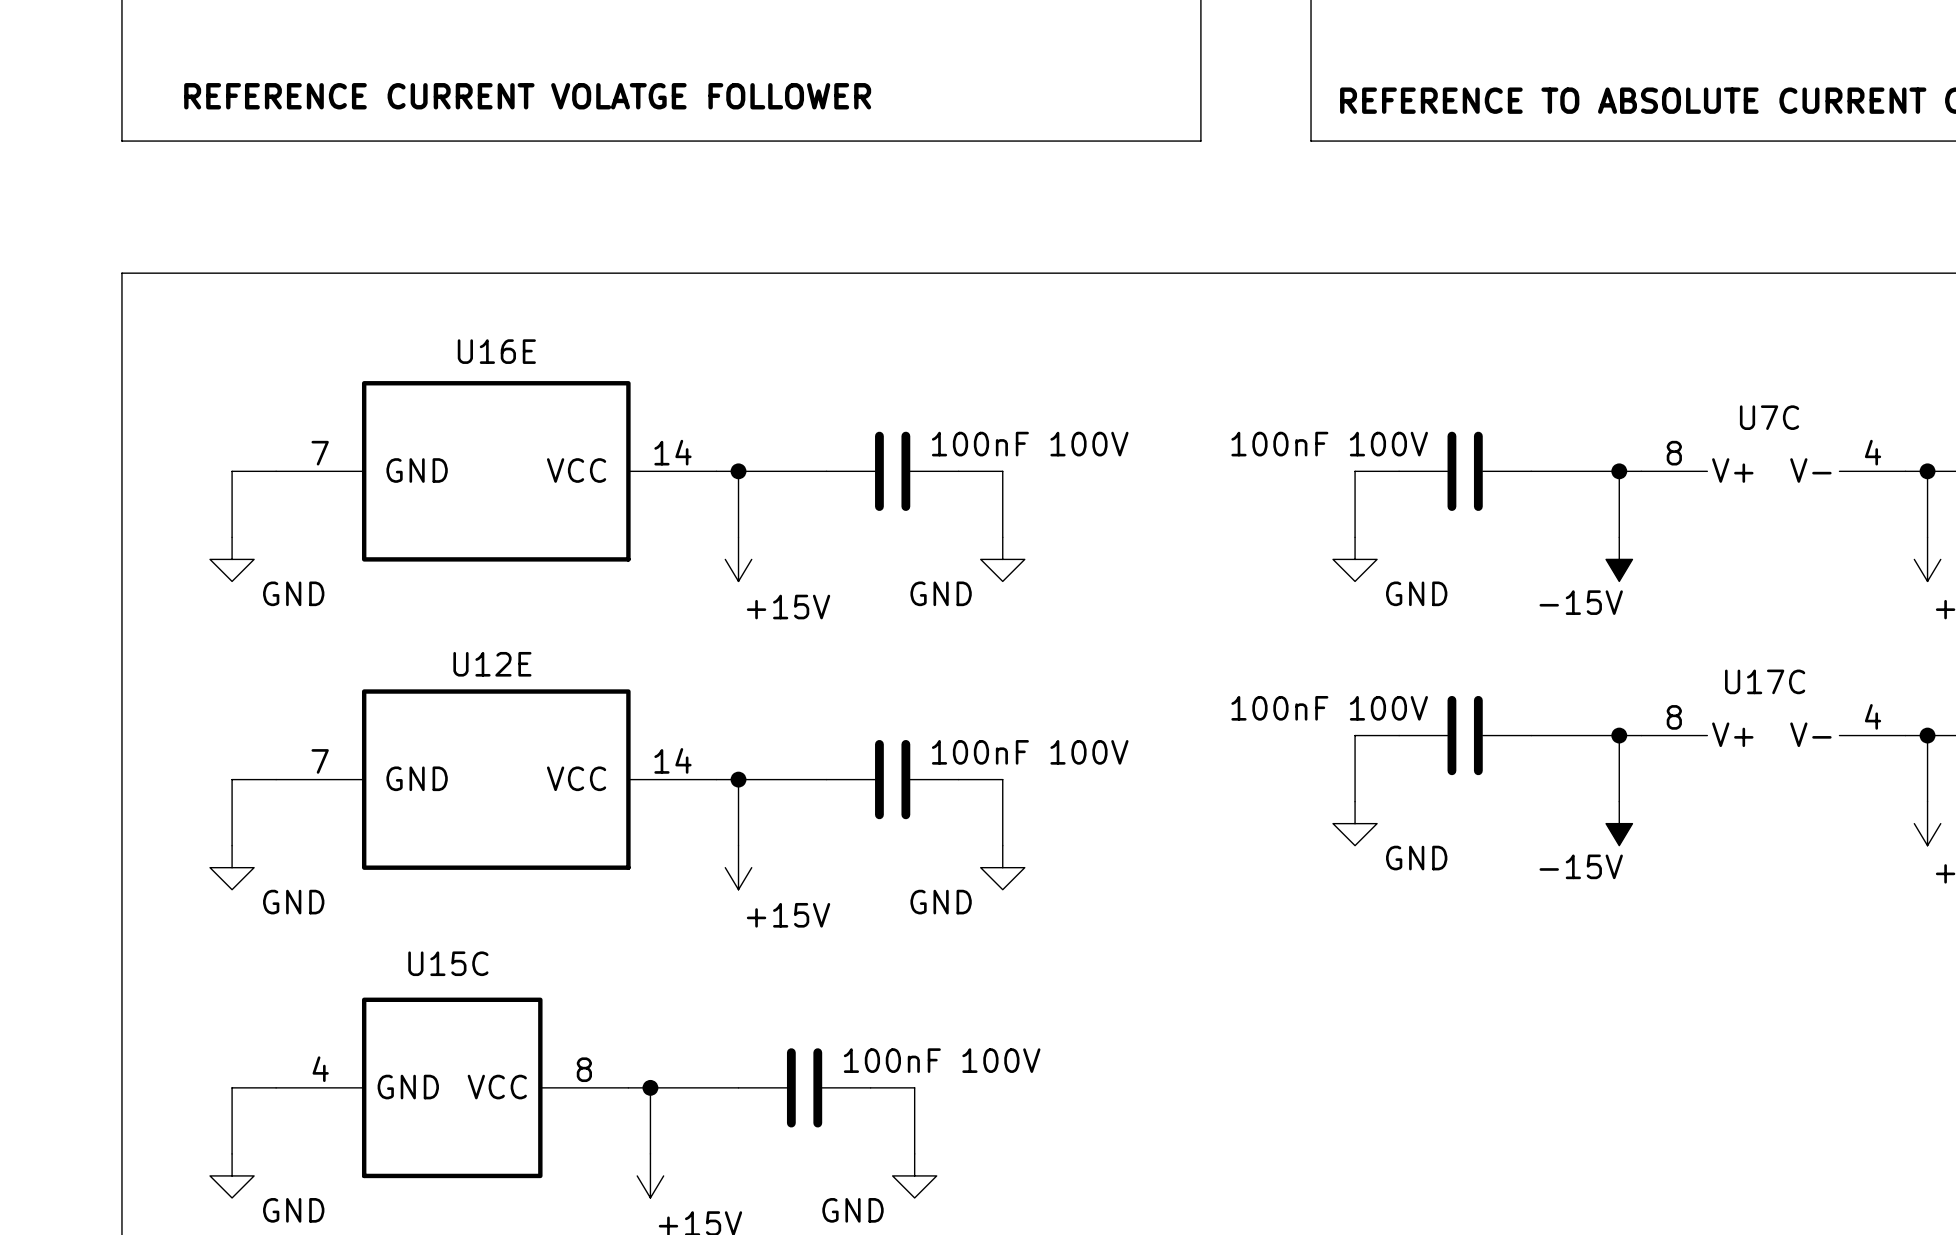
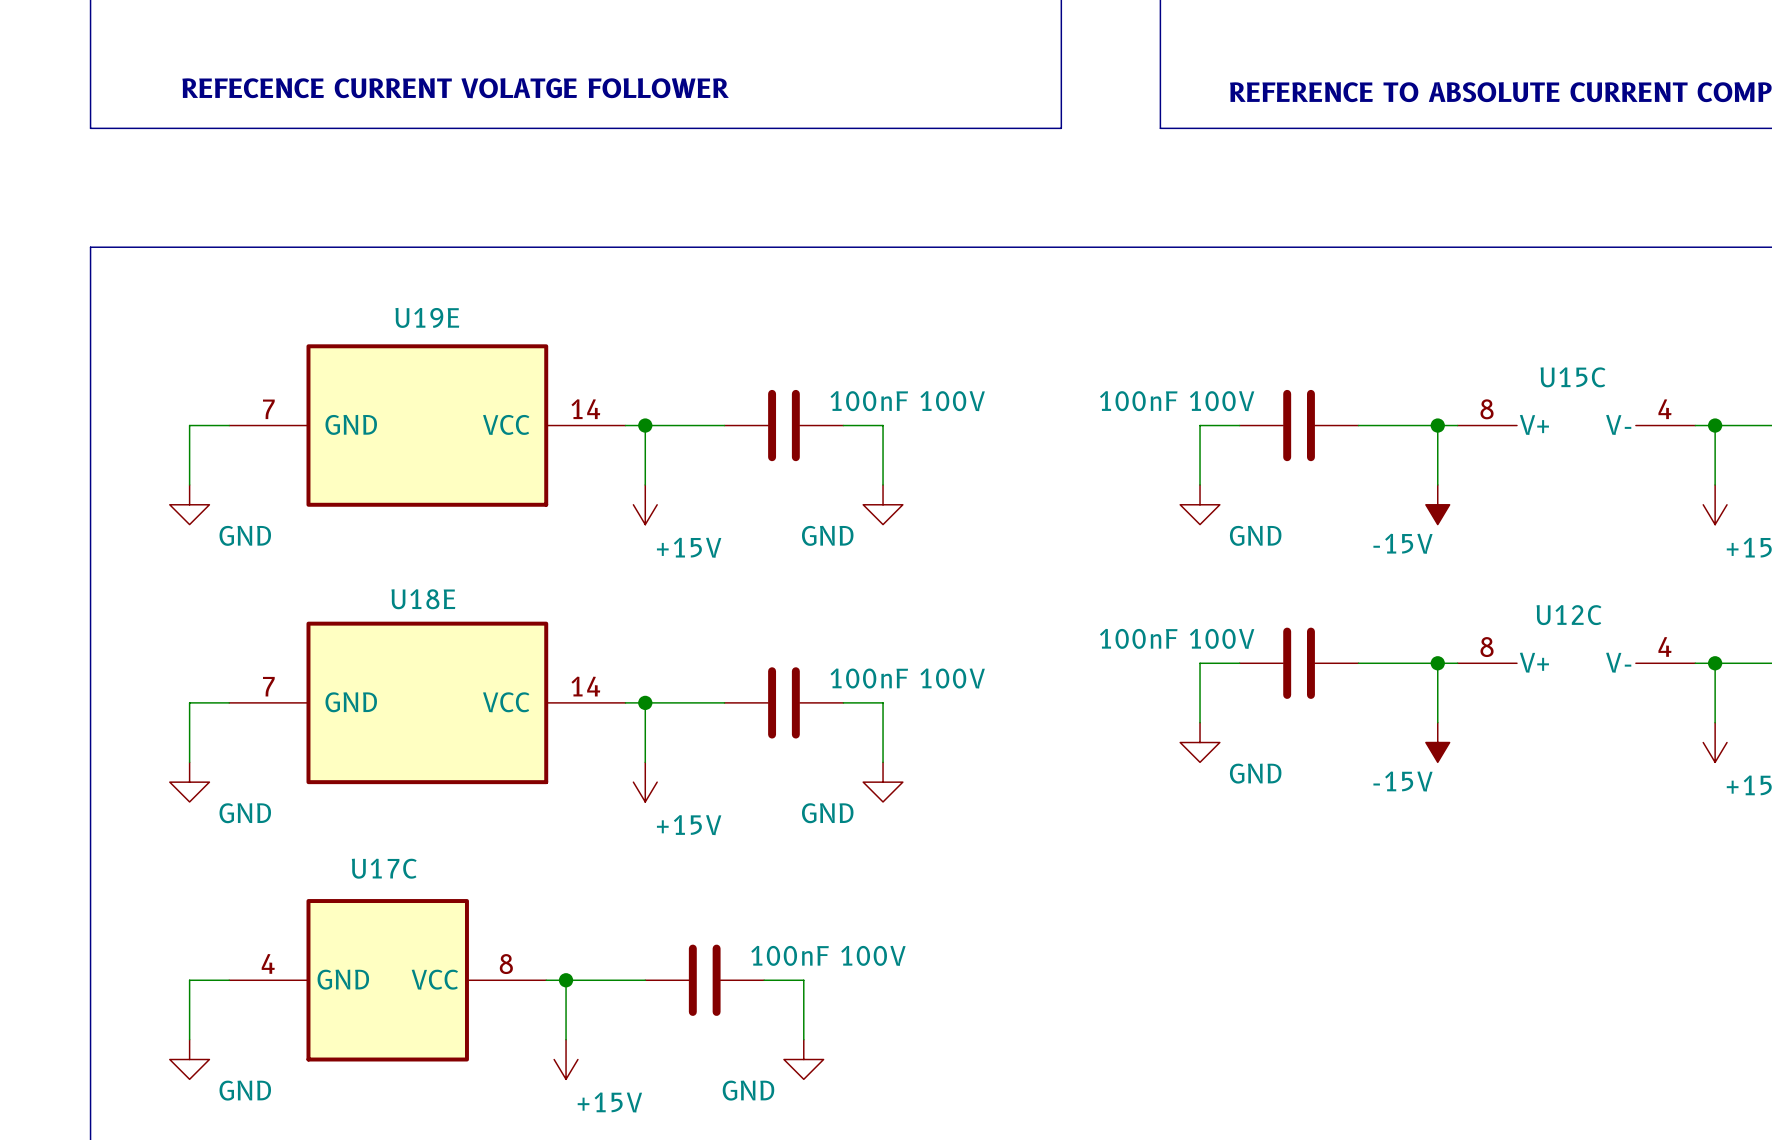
text: REFERENCE CURRENT VOLATGE FOLLOWER (527, 96) -> REFECENCE CURRENT VOLATGE FOLLOWER (455, 88)
U16E name: U16E (496, 351) -> U19E (427, 317)
U7C name: U7C (1769, 417) -> U15C (1572, 377)
U12E name: U12E (492, 664) -> U18E (423, 599)
U17C name: U17C (1765, 681) -> U12C (1568, 615)
U15C name: U15C (448, 963) -> U17C (384, 868)

